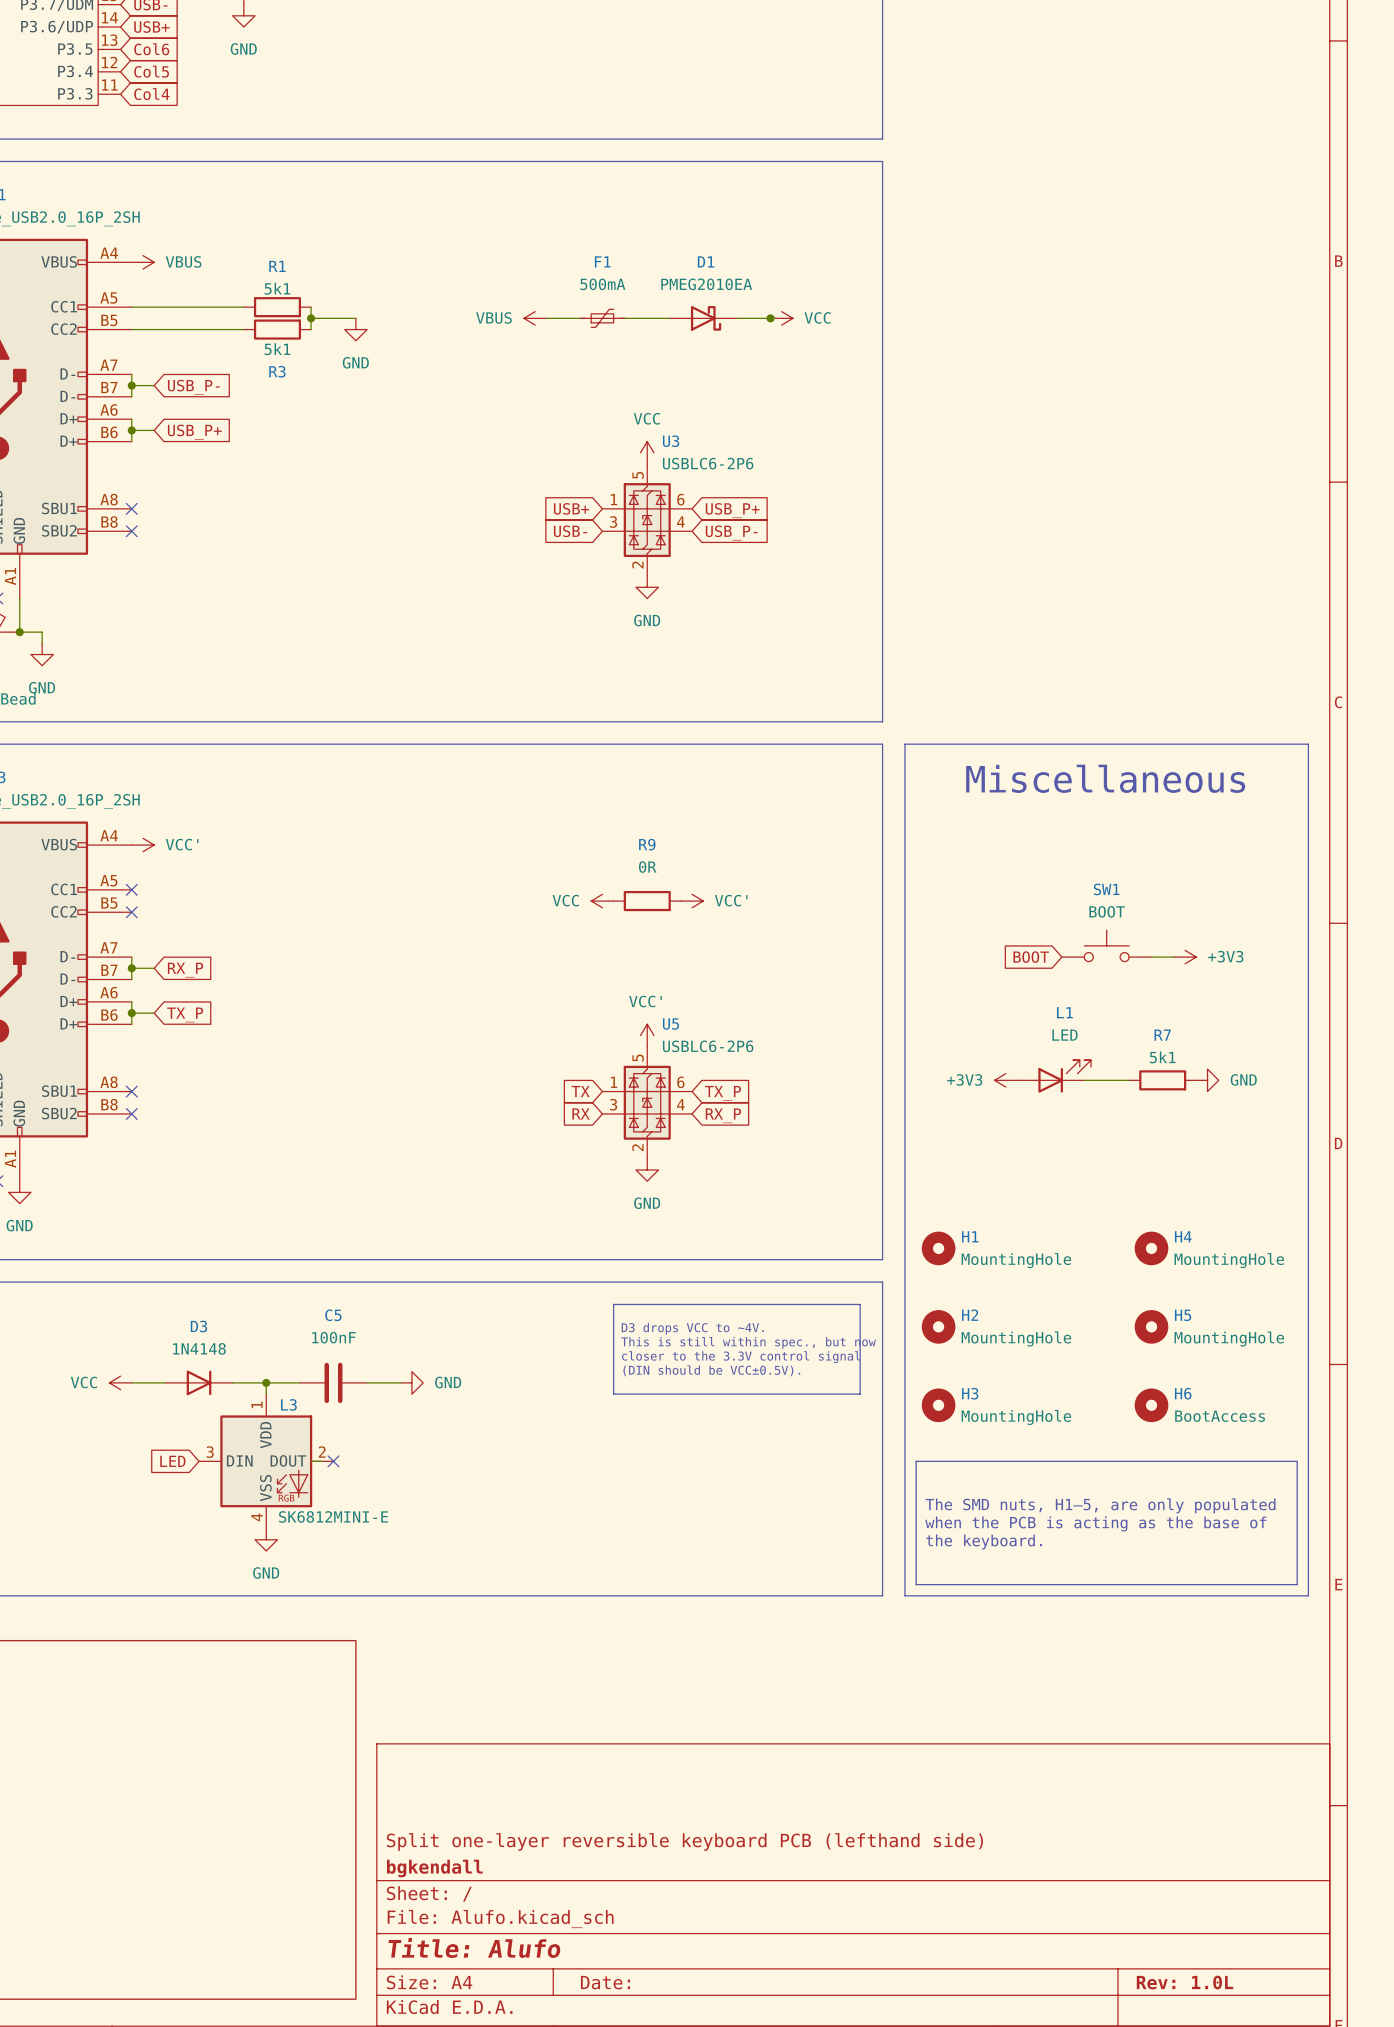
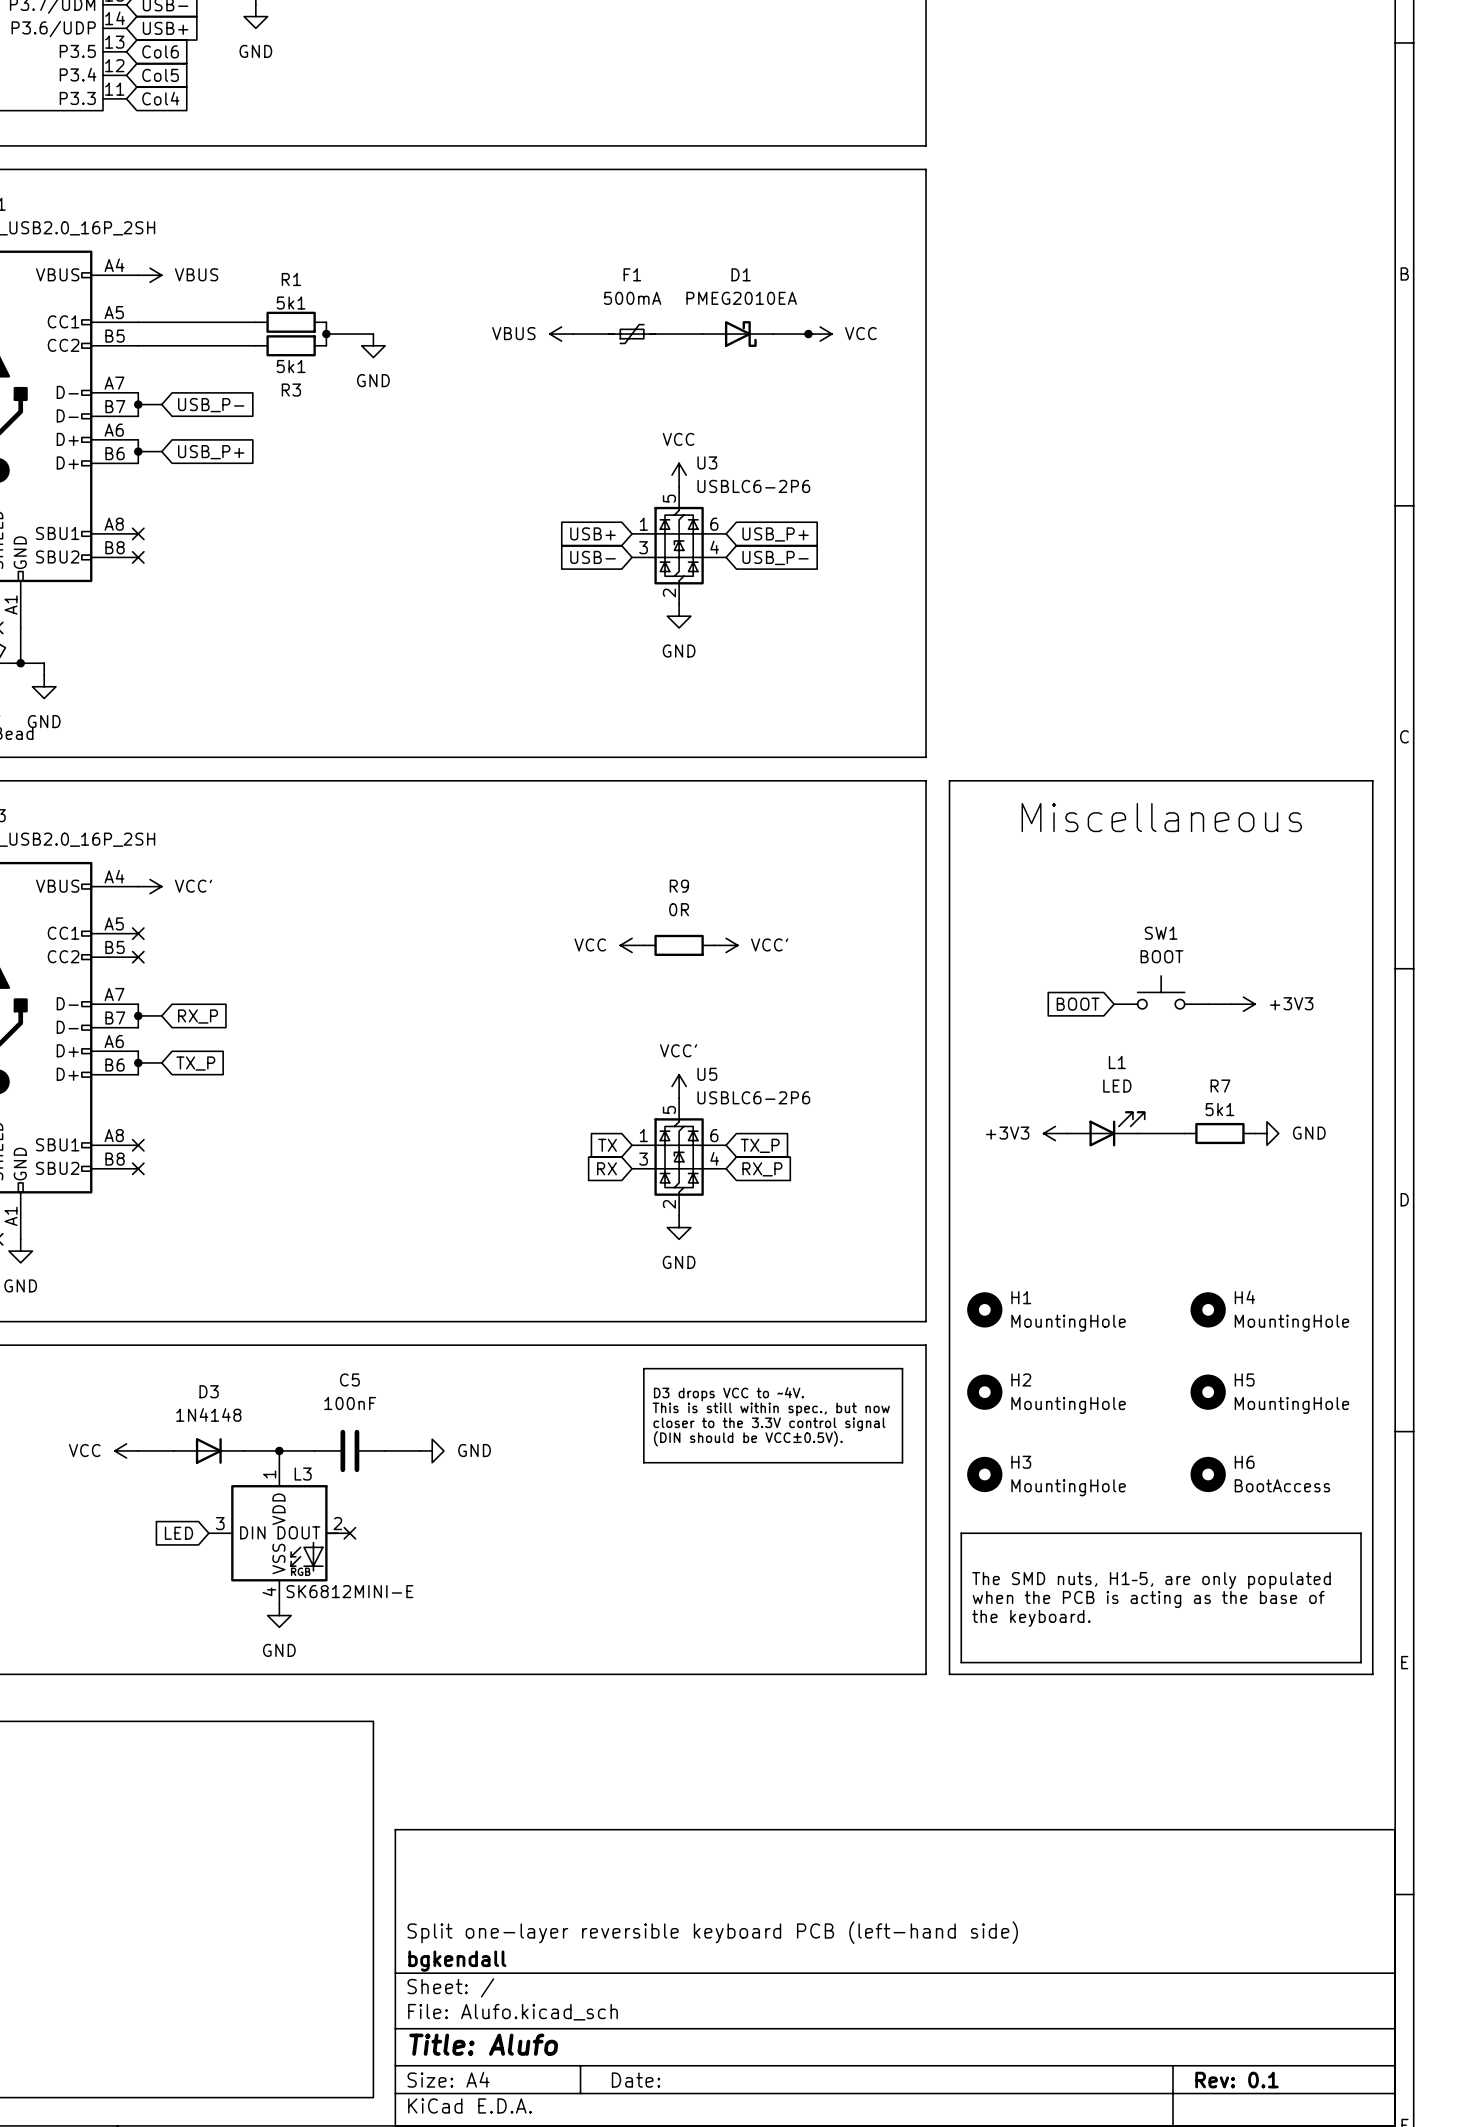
title block: Split one-layer reversible keyboard PCB (lefthand side) (684, 1841) -> Split one-layer reversible keyboard PCB (left-hand side) (712, 1932)
title block: Rev: 1.0L (1185, 1982) -> Rev: 0.1 (1236, 2080)

